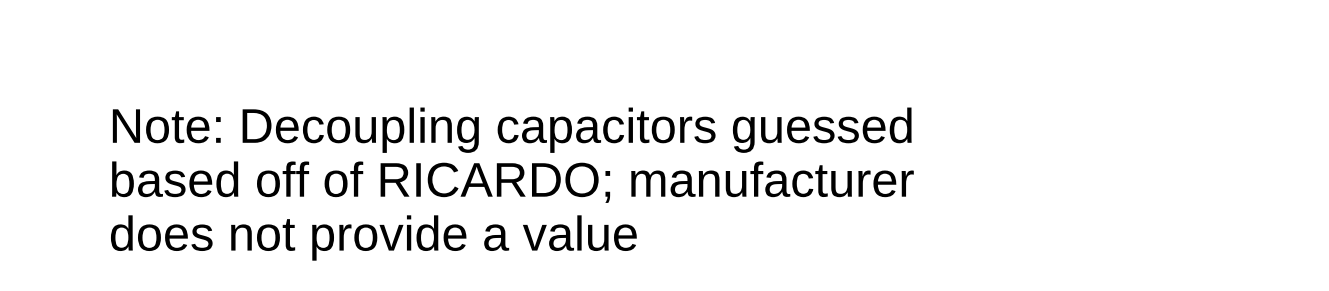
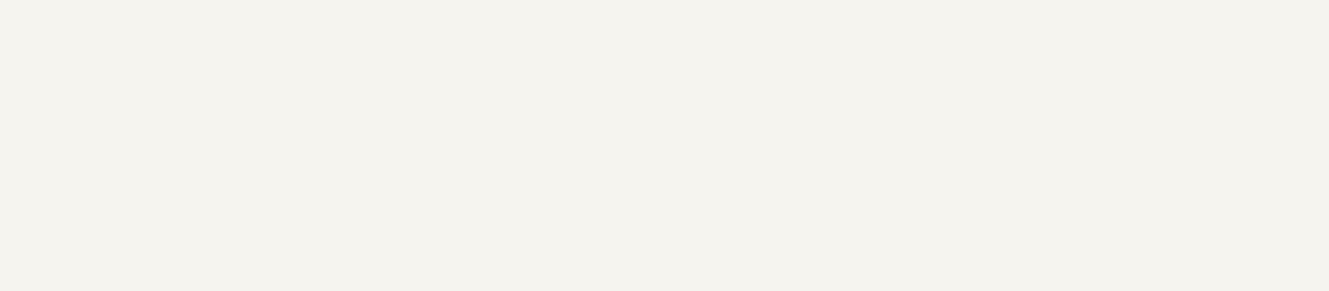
text: Note: Decoupling capacitors guessed (512, 130) -> none
text: based off of RICARDO; manufacturer (512, 182) -> none
text: does not provide a value (373, 237) -> none

